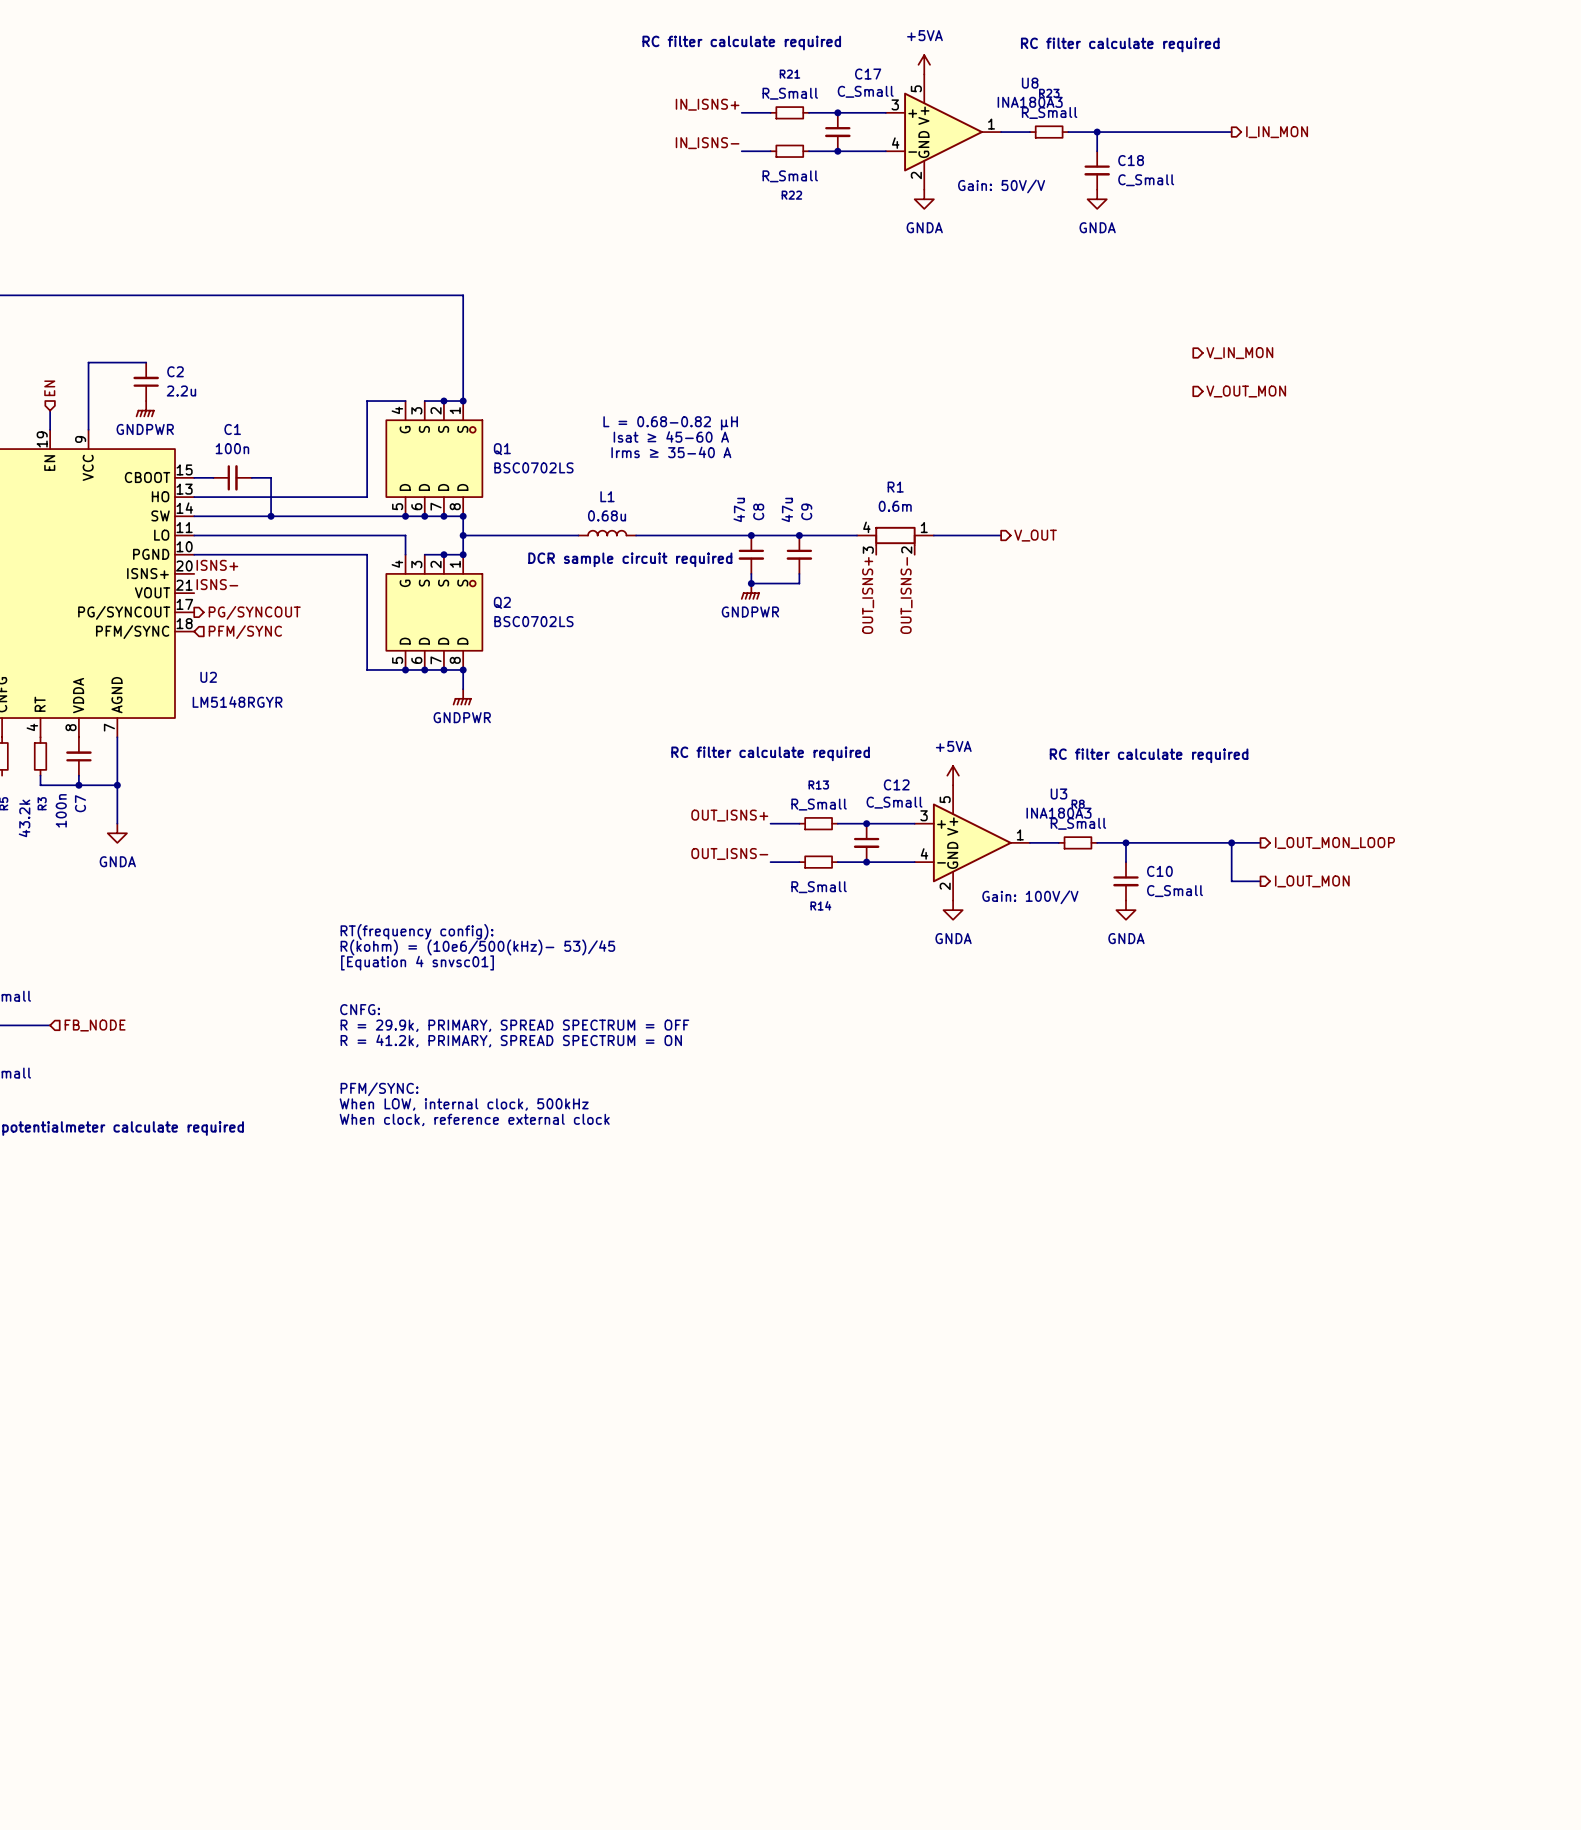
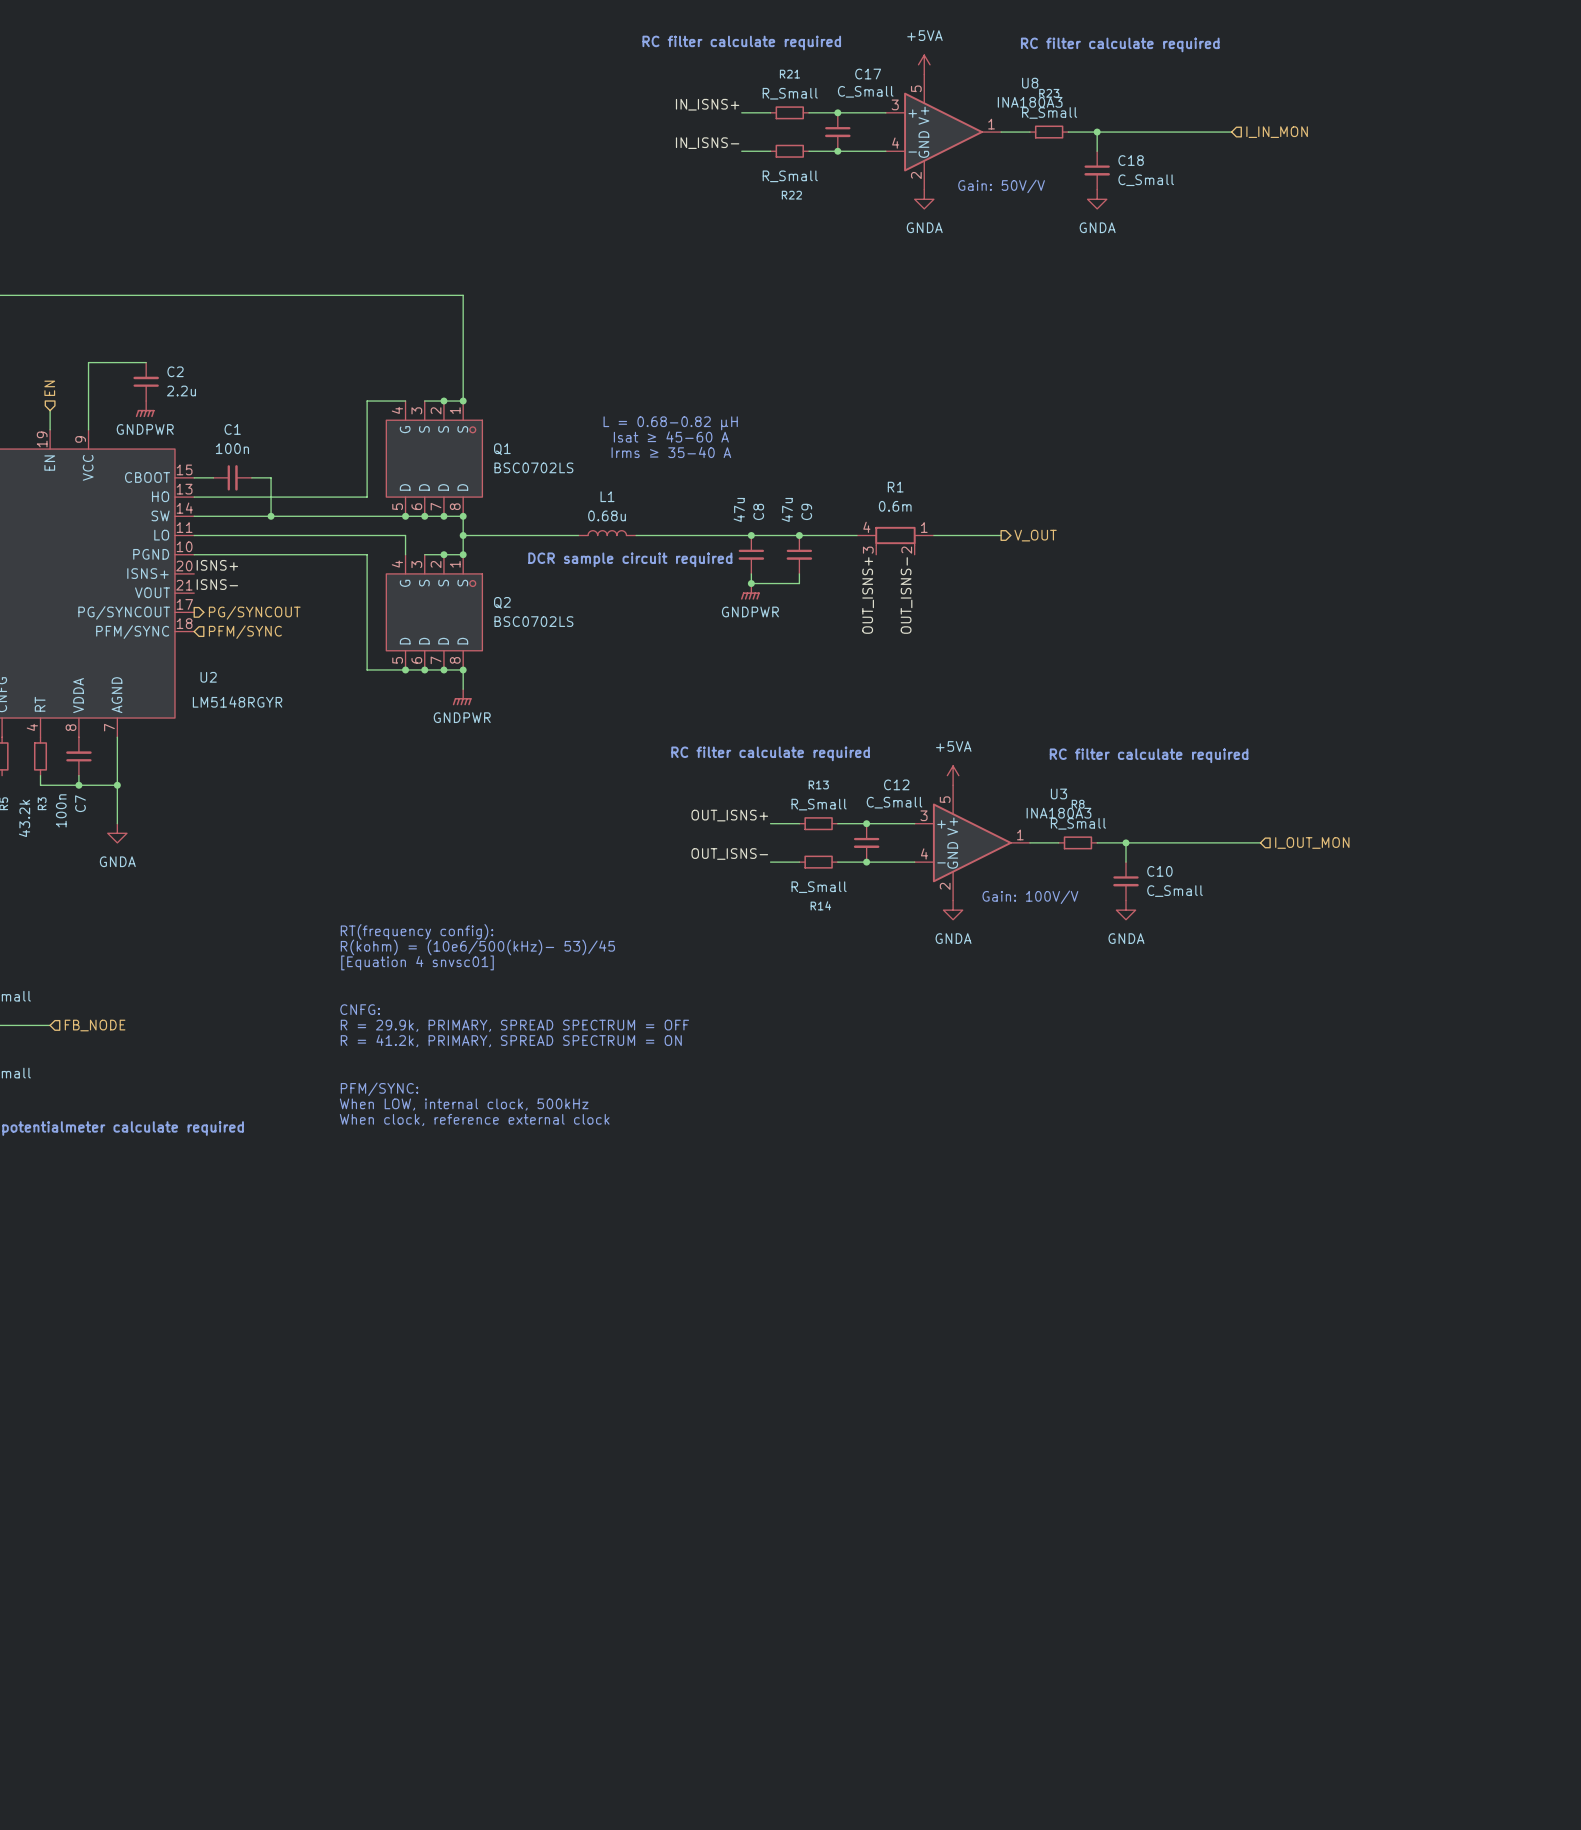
hierarchical label shape: output (1277, 132) -> input (1277, 132)
hierarchical label: V_IN_MON (1239, 353) -> none
hierarchical label: V_OUT_MON (1246, 391) -> none
wire: (1231, 842) (1231, 881) (1260, 881) -> none
junction: (1231, 842) -> none
hierarchical label shape: output (1334, 842) -> input (1312, 842)
hierarchical label: I_OUT_MON_LOOP (1334, 842) -> I_OUT_MON (1312, 842)
hierarchical label: I_OUT_MON (1312, 881) -> none

